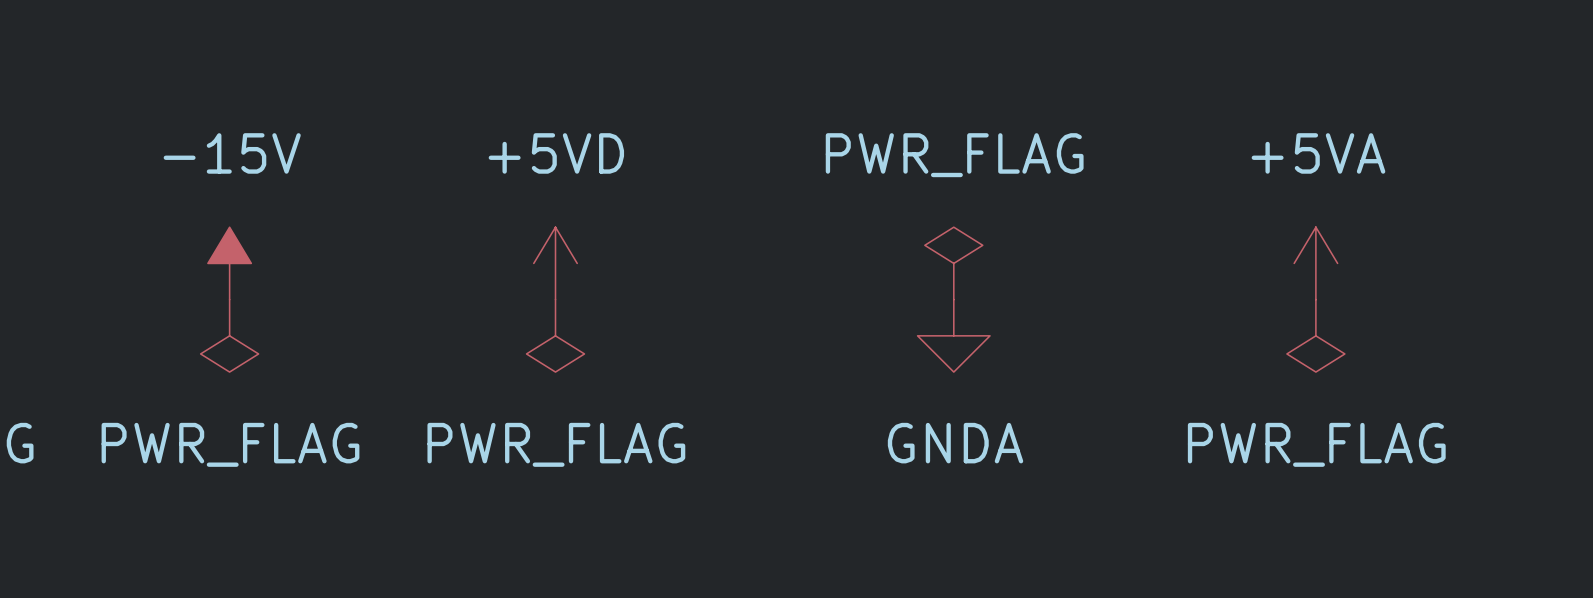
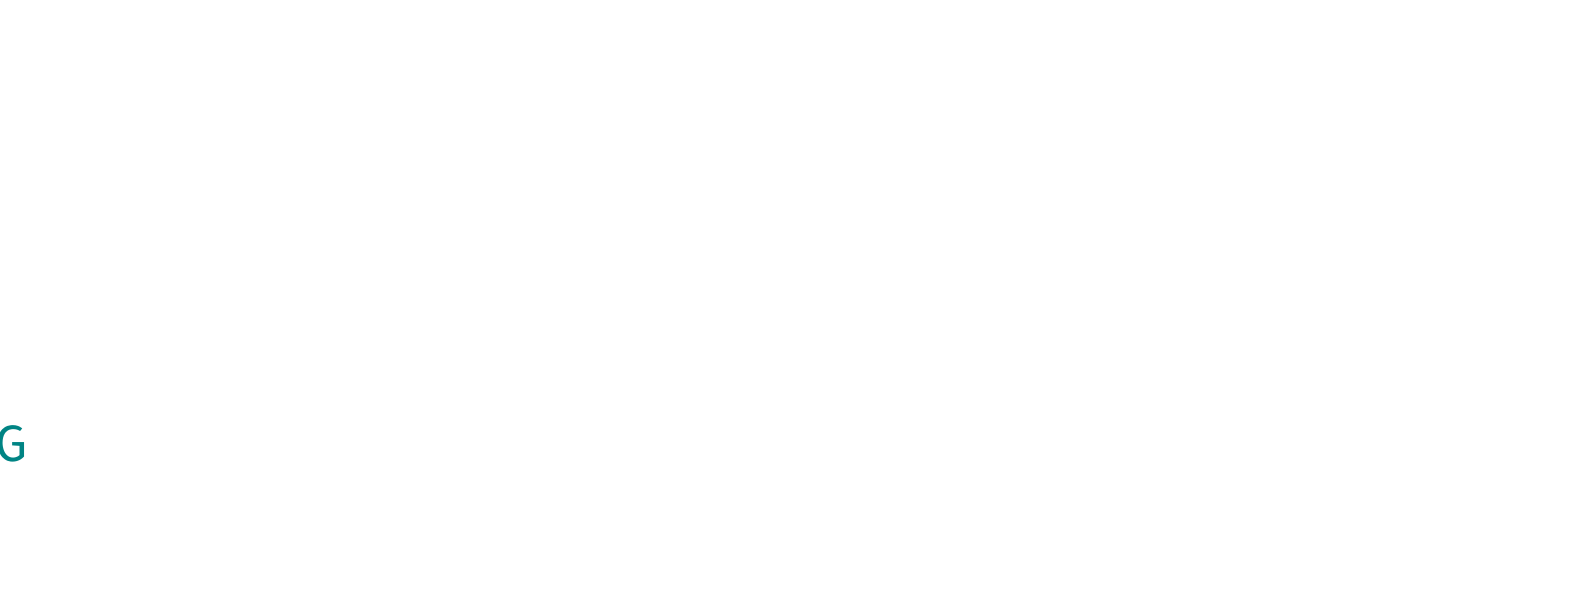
power symbol: -15V (229, 263) -> none
power symbol: +5VD (555, 263) -> none
power symbol: PWR_FLAG (953, 263) -> none
power symbol: +5VA (1315, 263) -> none
power symbol: PWR_FLAG (229, 335) -> none
power symbol: PWR_FLAG (555, 335) -> none
power symbol: GNDA (953, 335) -> none
power symbol: PWR_FLAG (1315, 335) -> none

